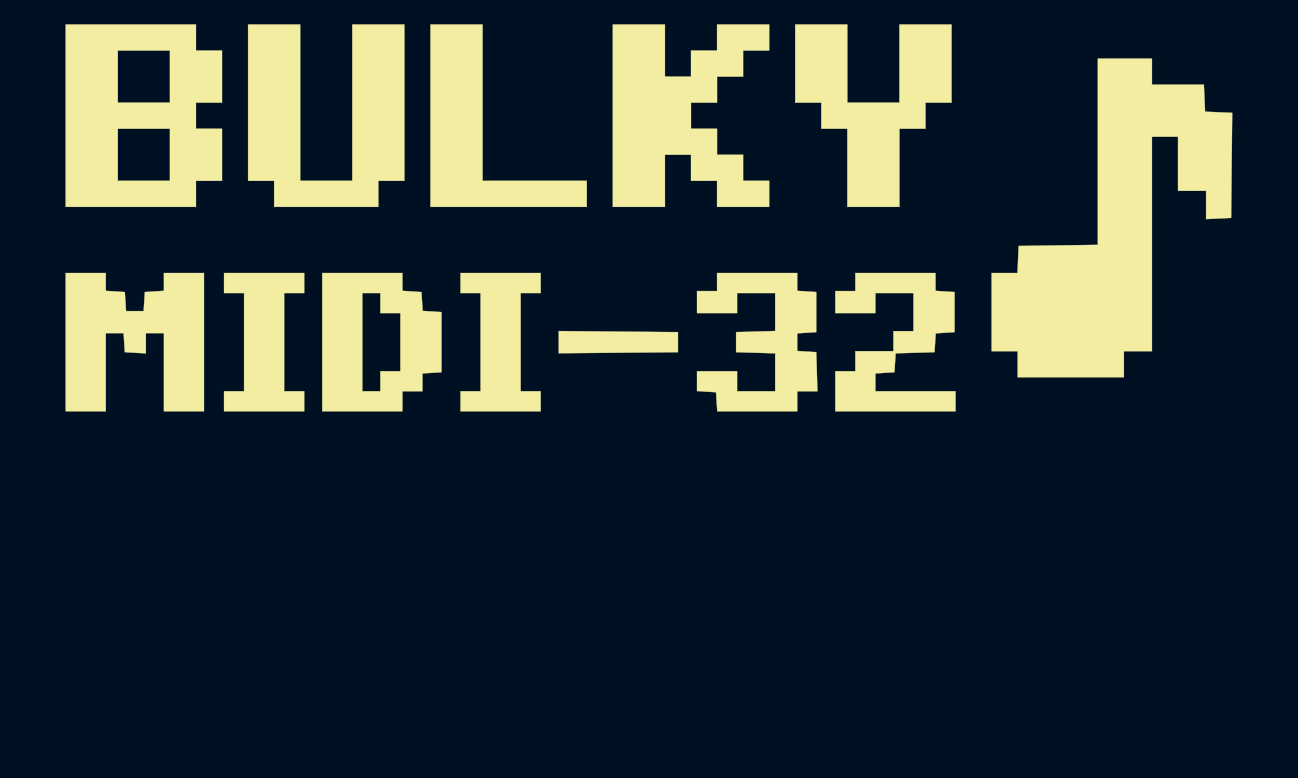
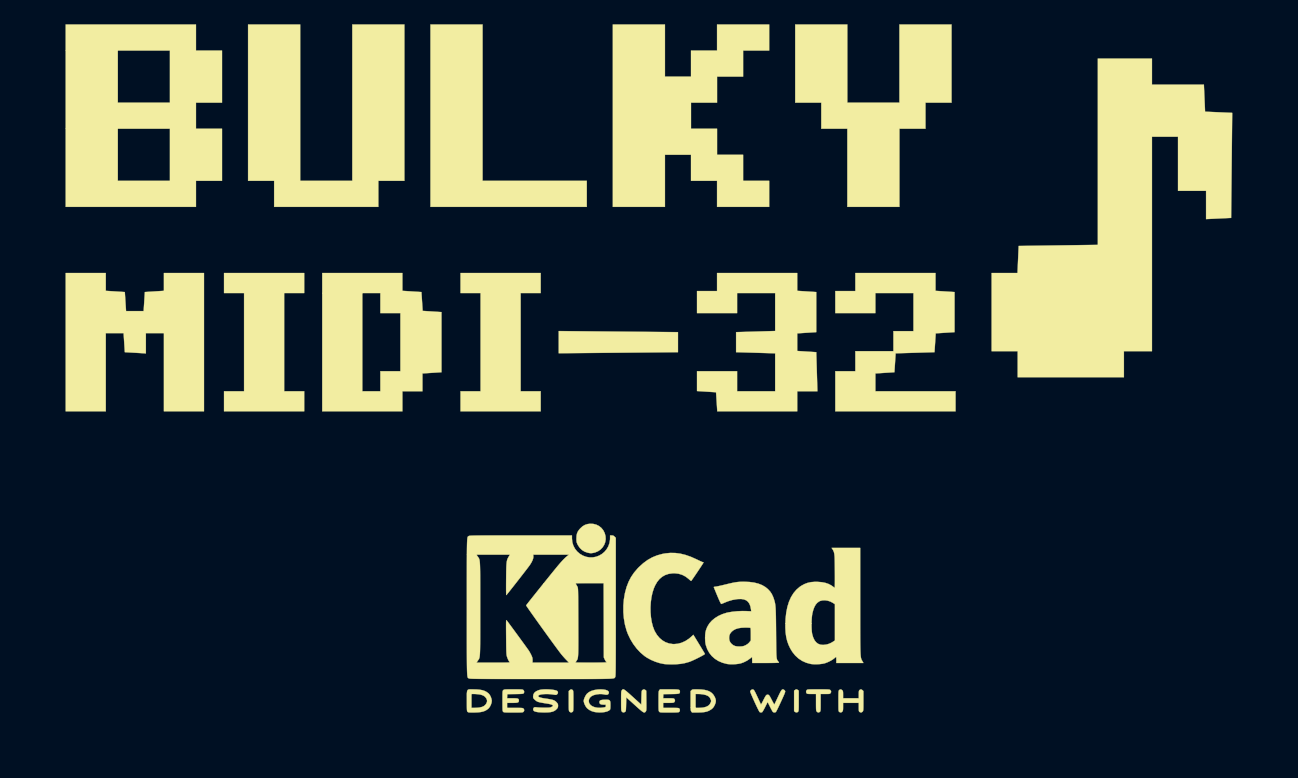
drawing: none -> [466, 523, 864, 713]

